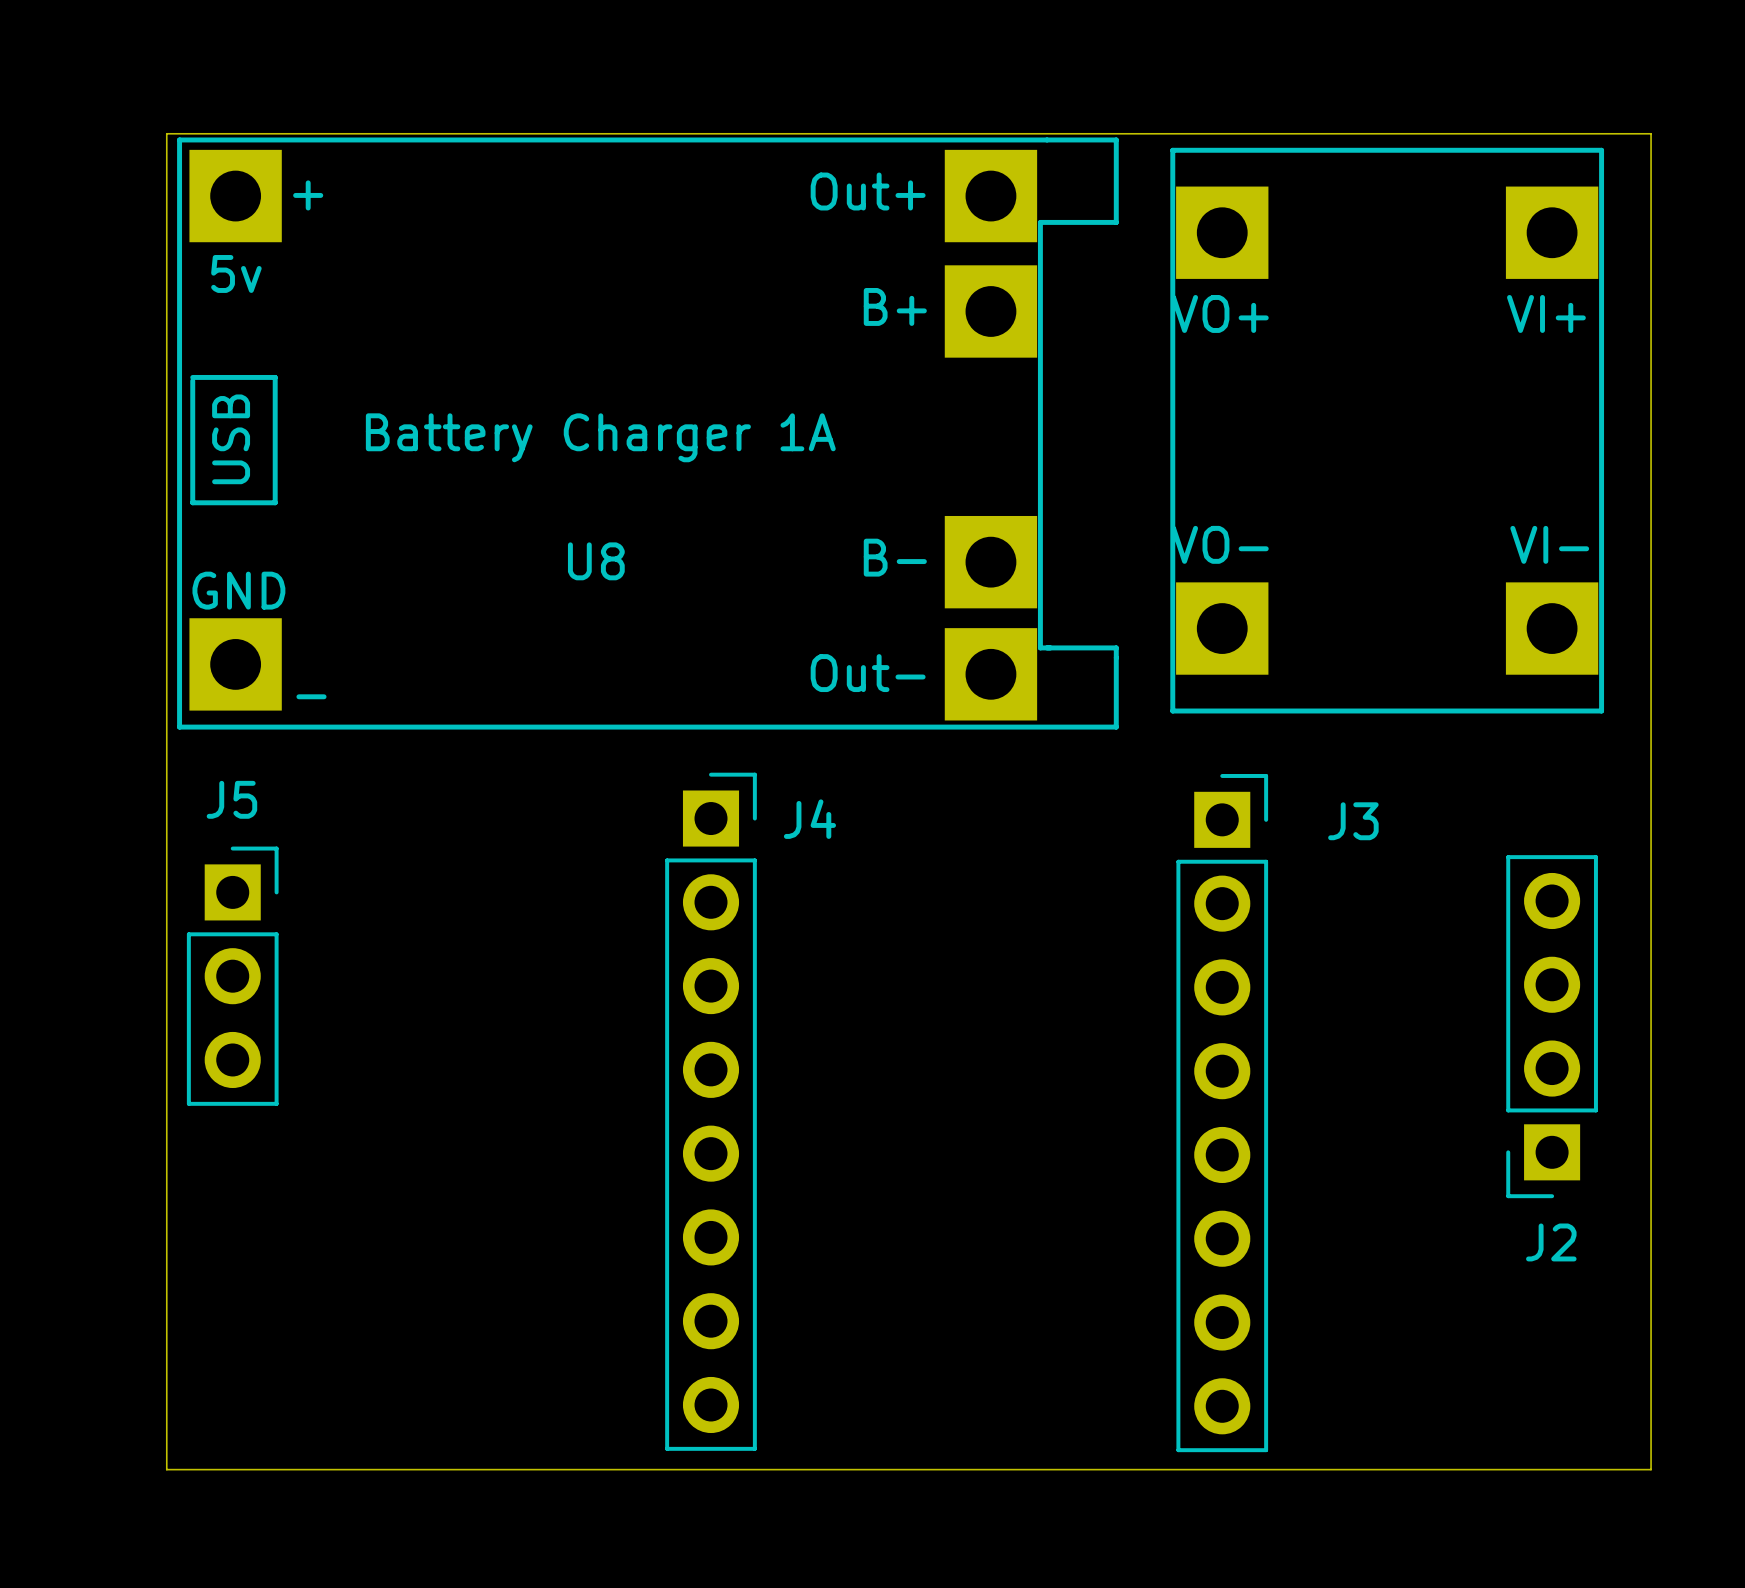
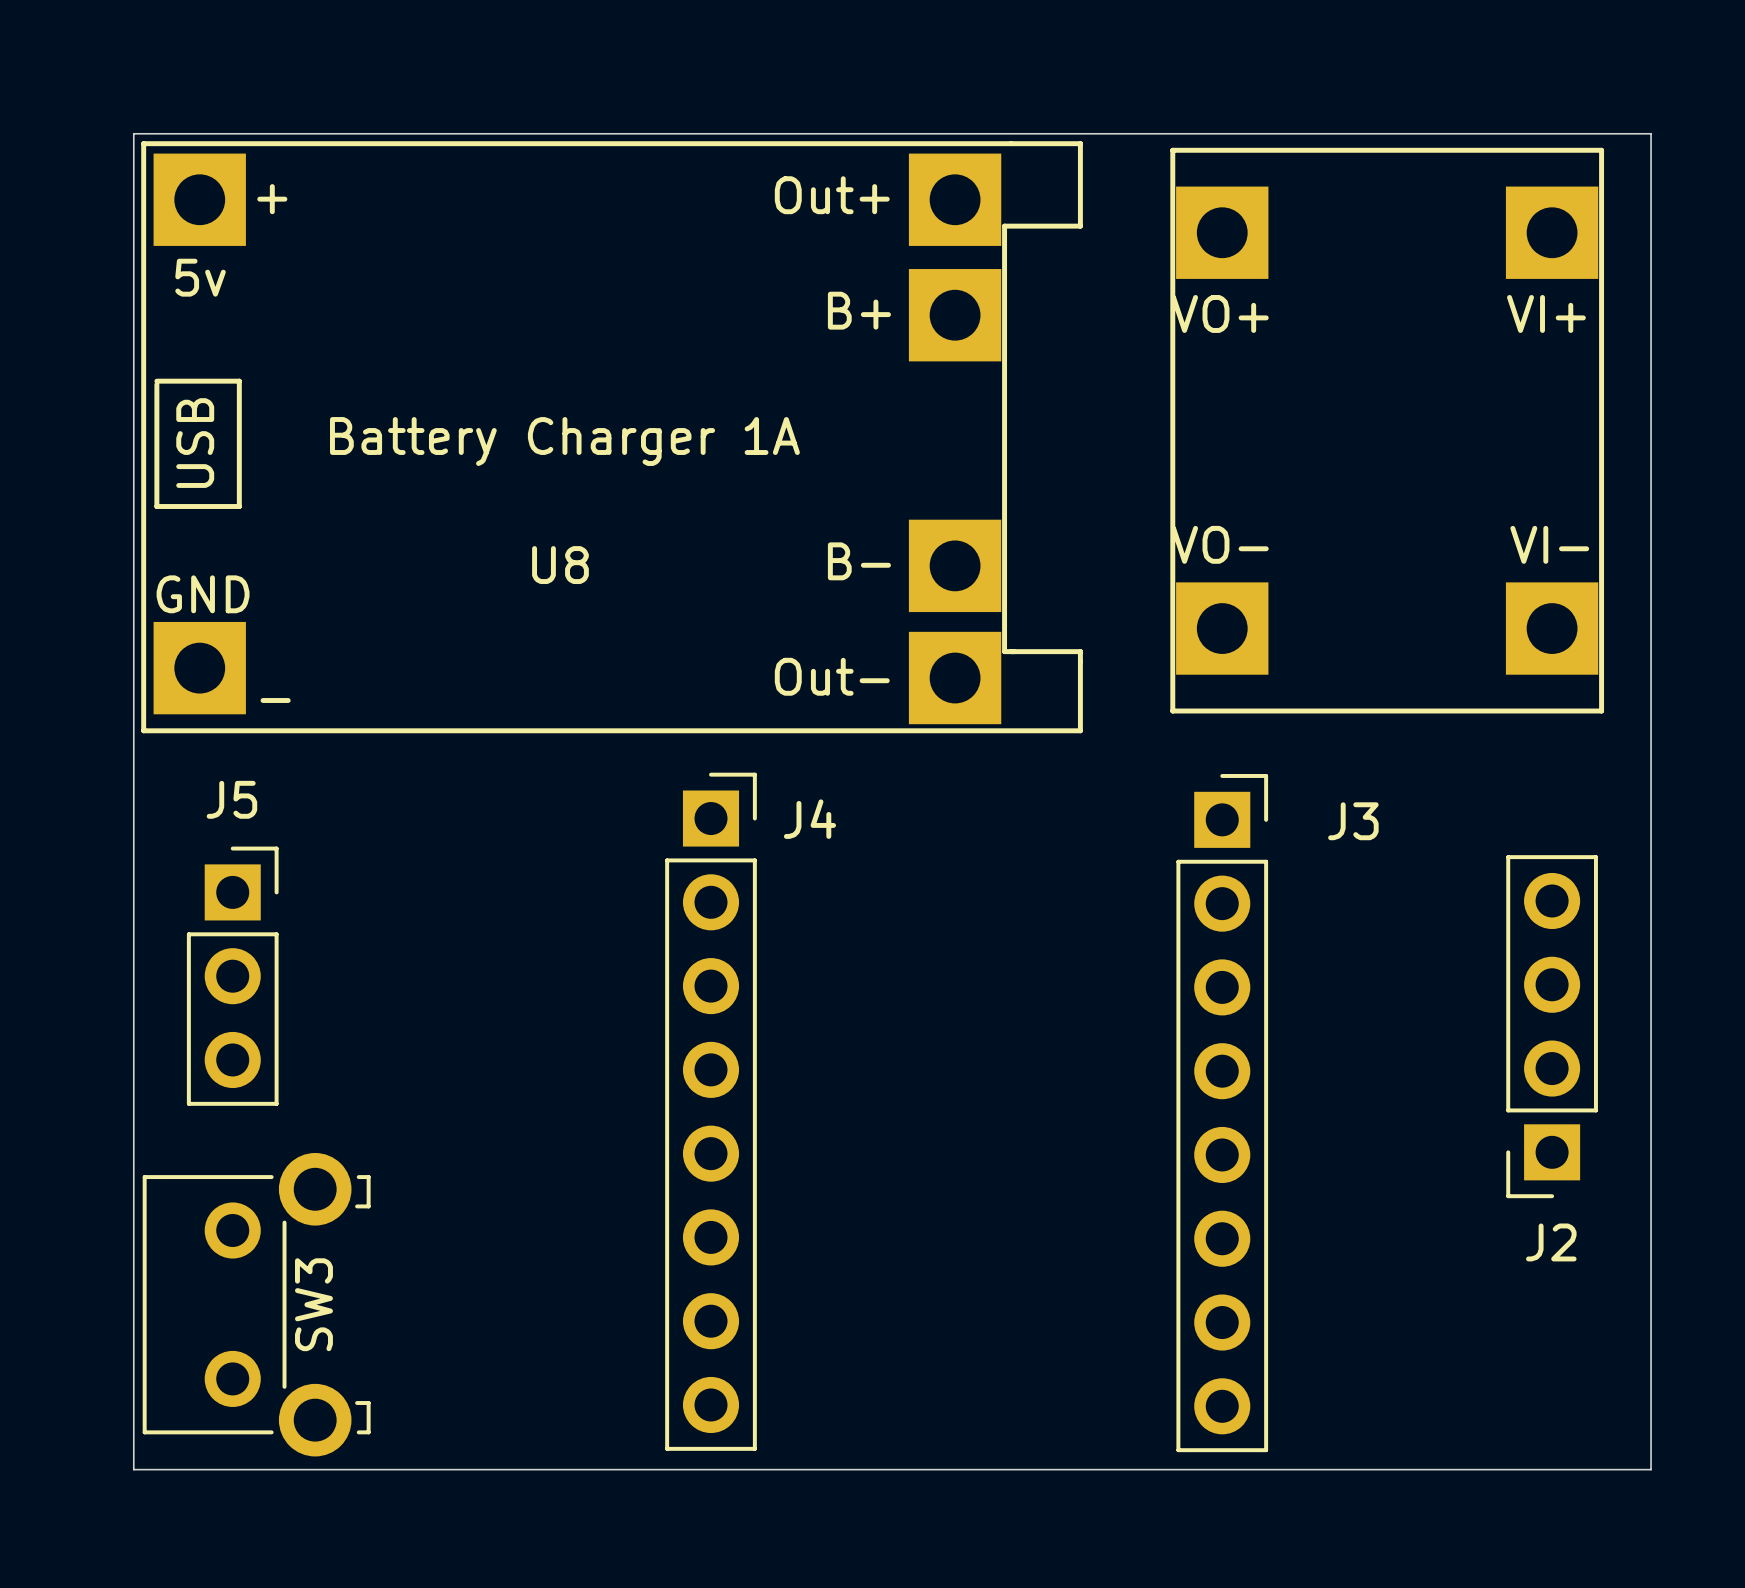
board edge: (166, 133) (166, 1469) -> (166, 133) (133, 133) (133, 1469) (166, 1469)
U8 position: (647, 433) -> (612, 437)
SW3: none -> (256, 1304)

